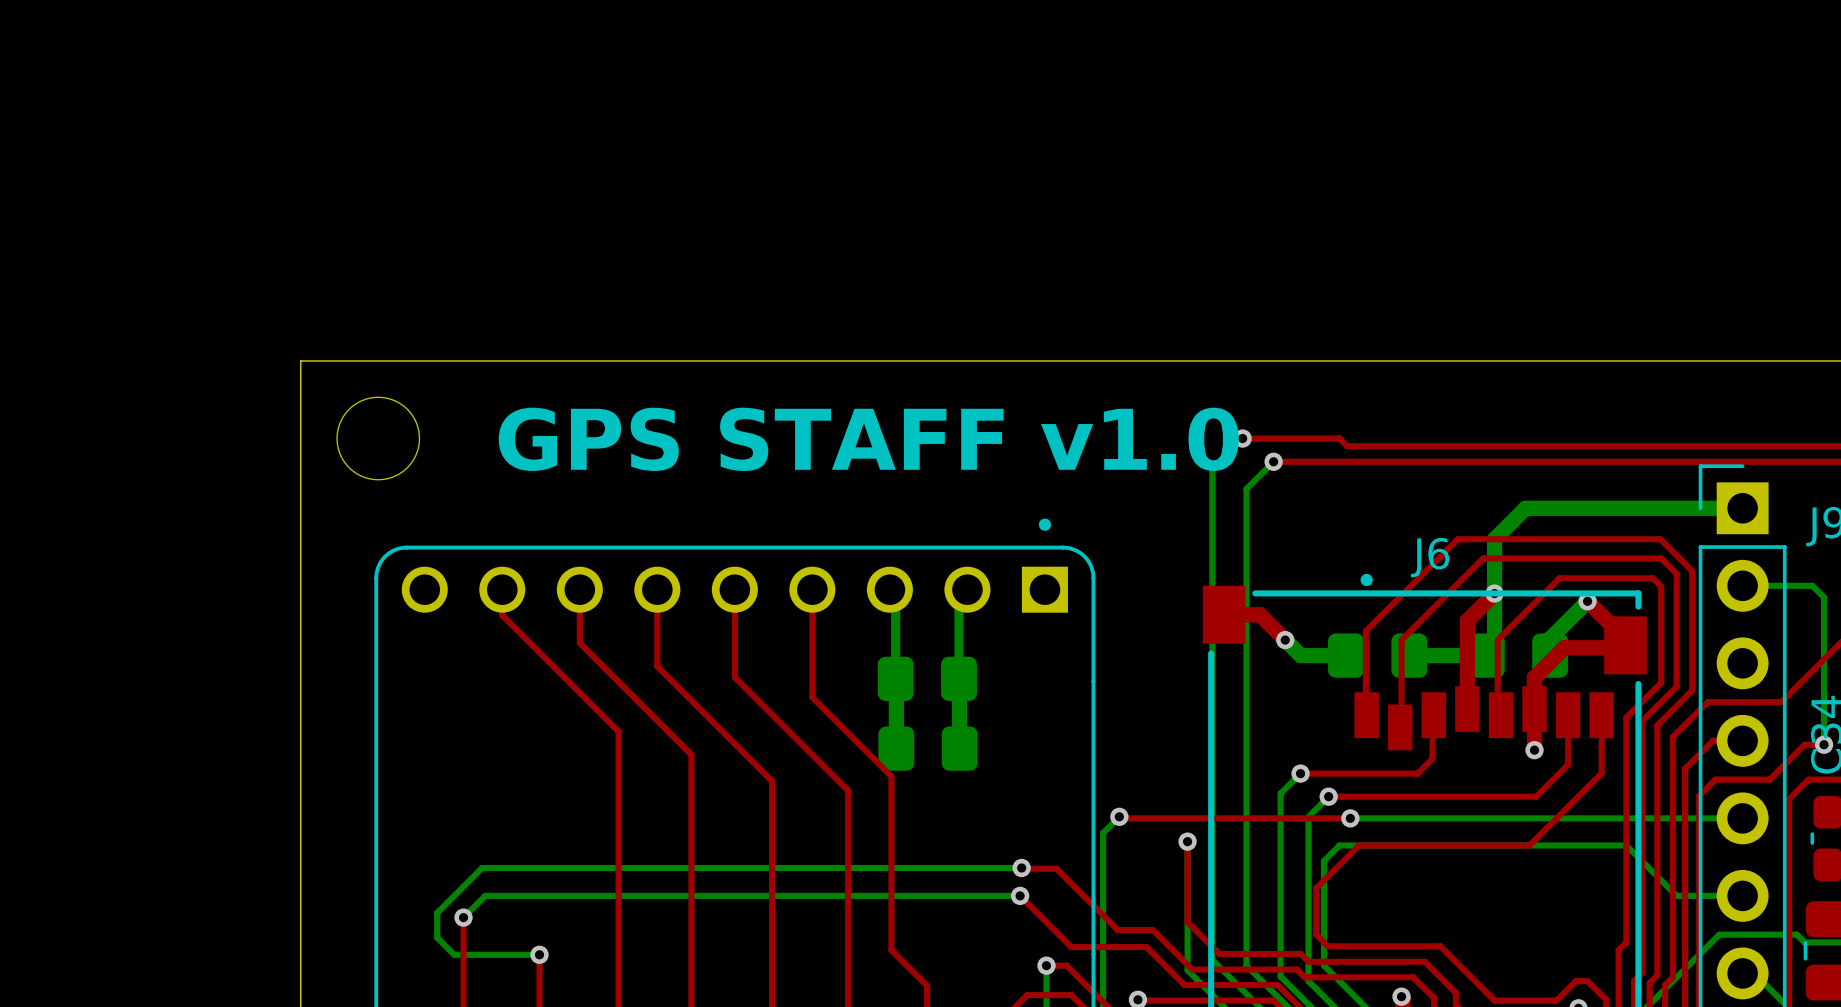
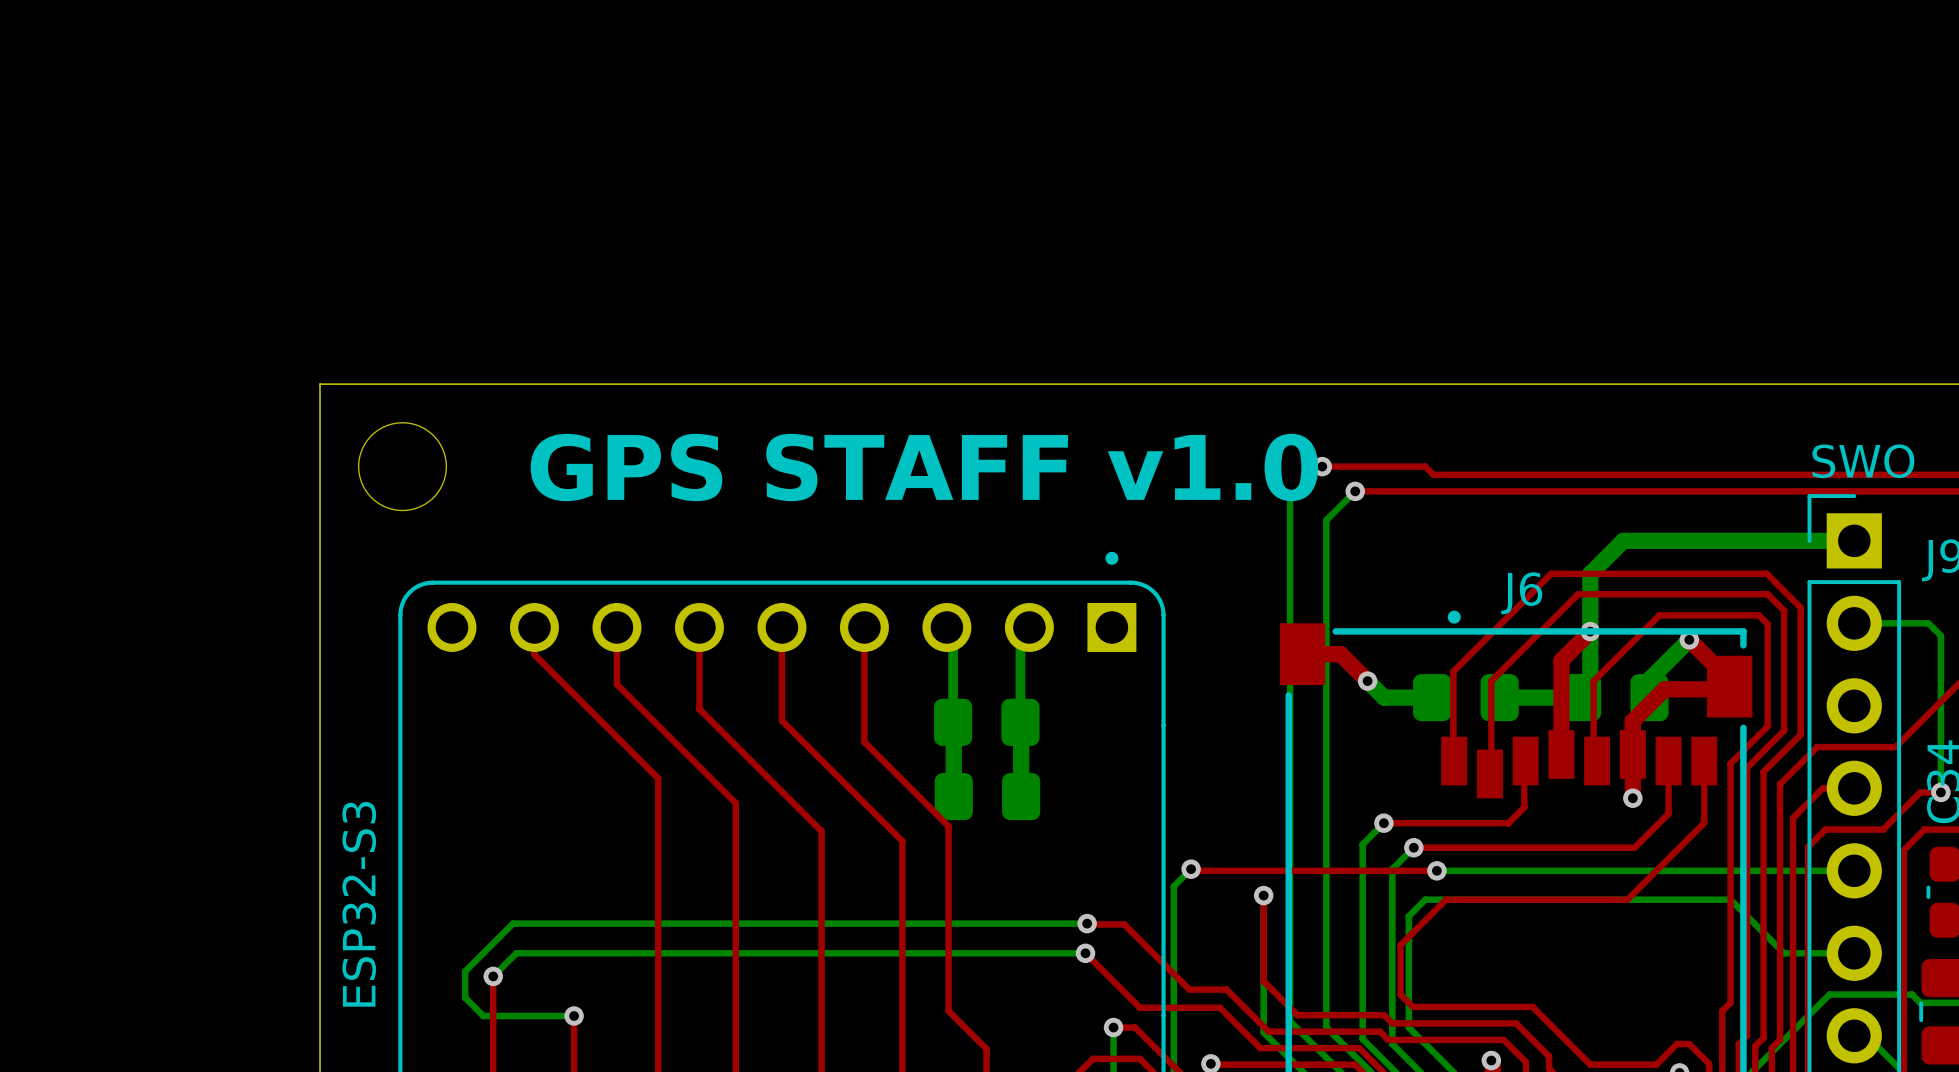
text: none -> SWO (1863, 461)
text: none -> ESP32-S3 (359, 904)

